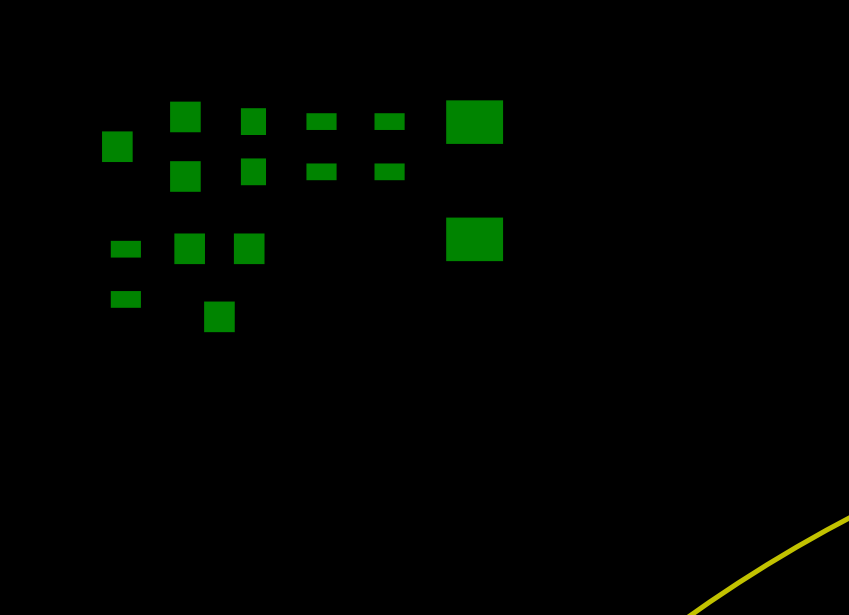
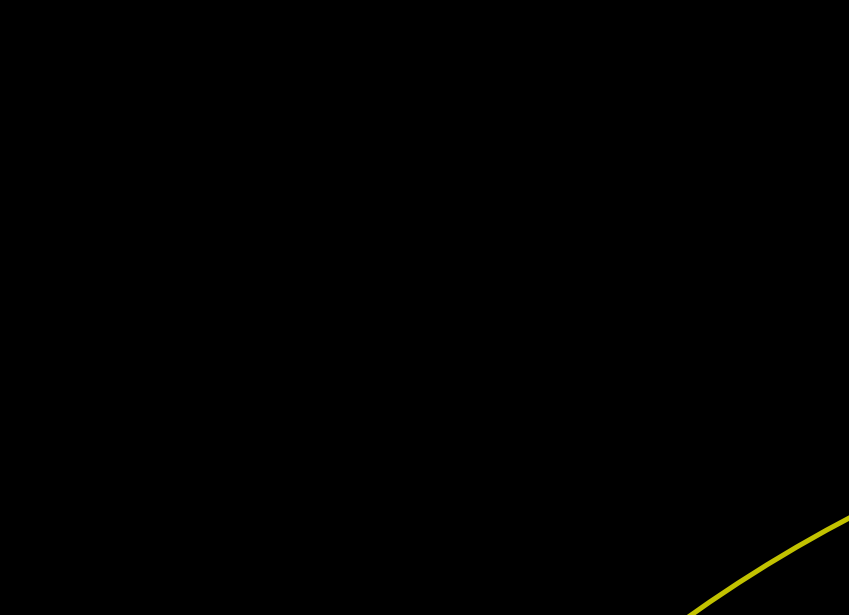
part: (151, 146) -> none
part: (253, 146) -> none
part: (321, 146) -> none
part: (389, 146) -> none
part: (474, 180) -> none
part: (125, 274) -> none
part: (219, 282) -> none

